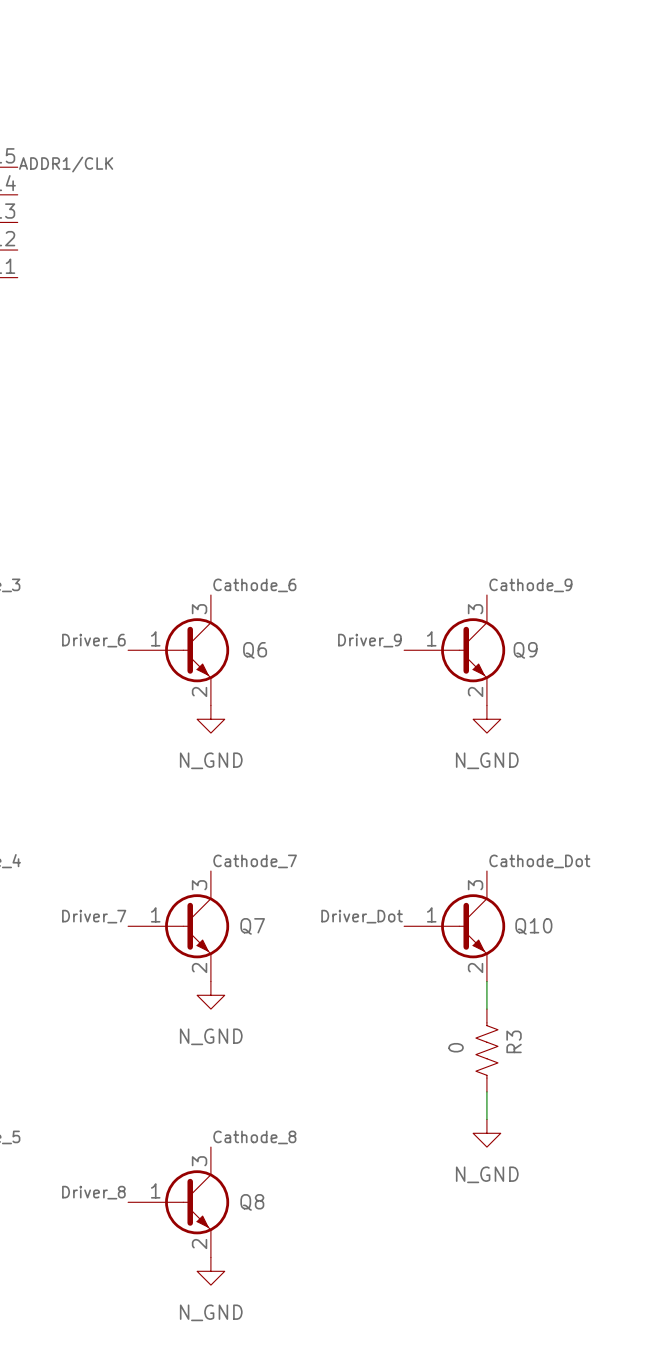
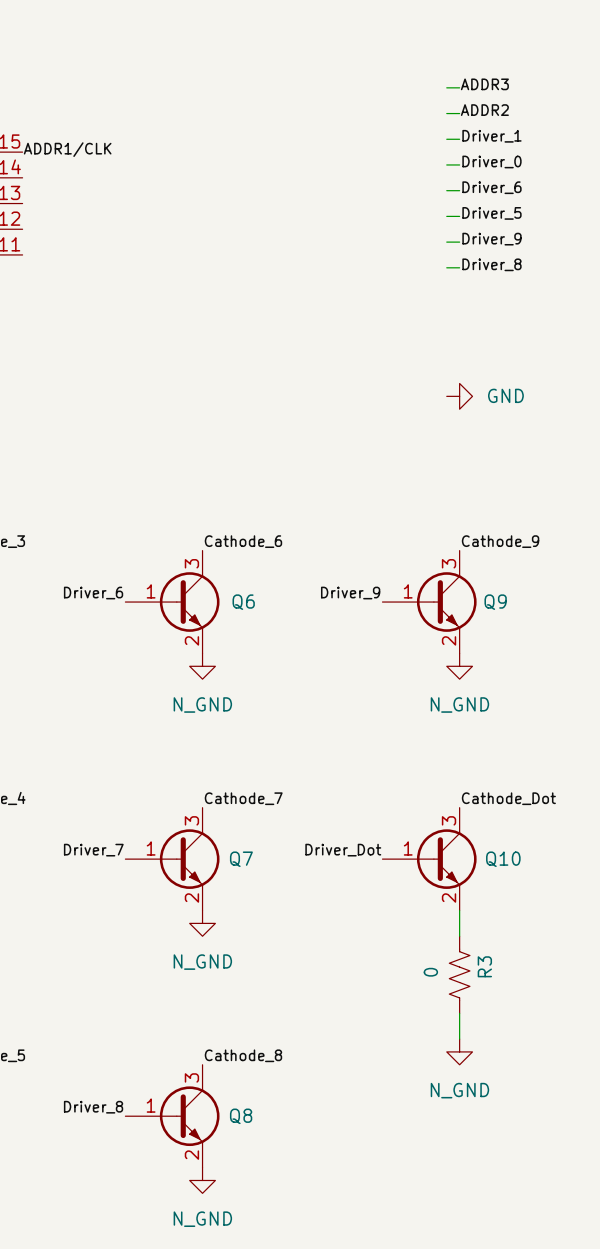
label: none -> ADDR3 (484, 84)
wire: none -> (446, 87) (459, 87)
label: none -> ADDR2 (484, 110)
wire: none -> (446, 113) (459, 113)
label: none -> Driver_1 (491, 136)
wire: none -> (446, 139) (459, 139)
label: none -> Driver_0 (491, 161)
wire: none -> (446, 164) (459, 164)
label: none -> Driver_6 (491, 187)
wire: none -> (446, 190) (459, 190)
label: none -> Driver_5 (491, 213)
wire: none -> (446, 216) (459, 216)
label: none -> Driver_9 (491, 239)
wire: none -> (446, 242) (459, 242)
label: none -> Driver_8 (491, 264)
wire: none -> (446, 267) (459, 267)
power symbol: none -> GND (459, 396)

